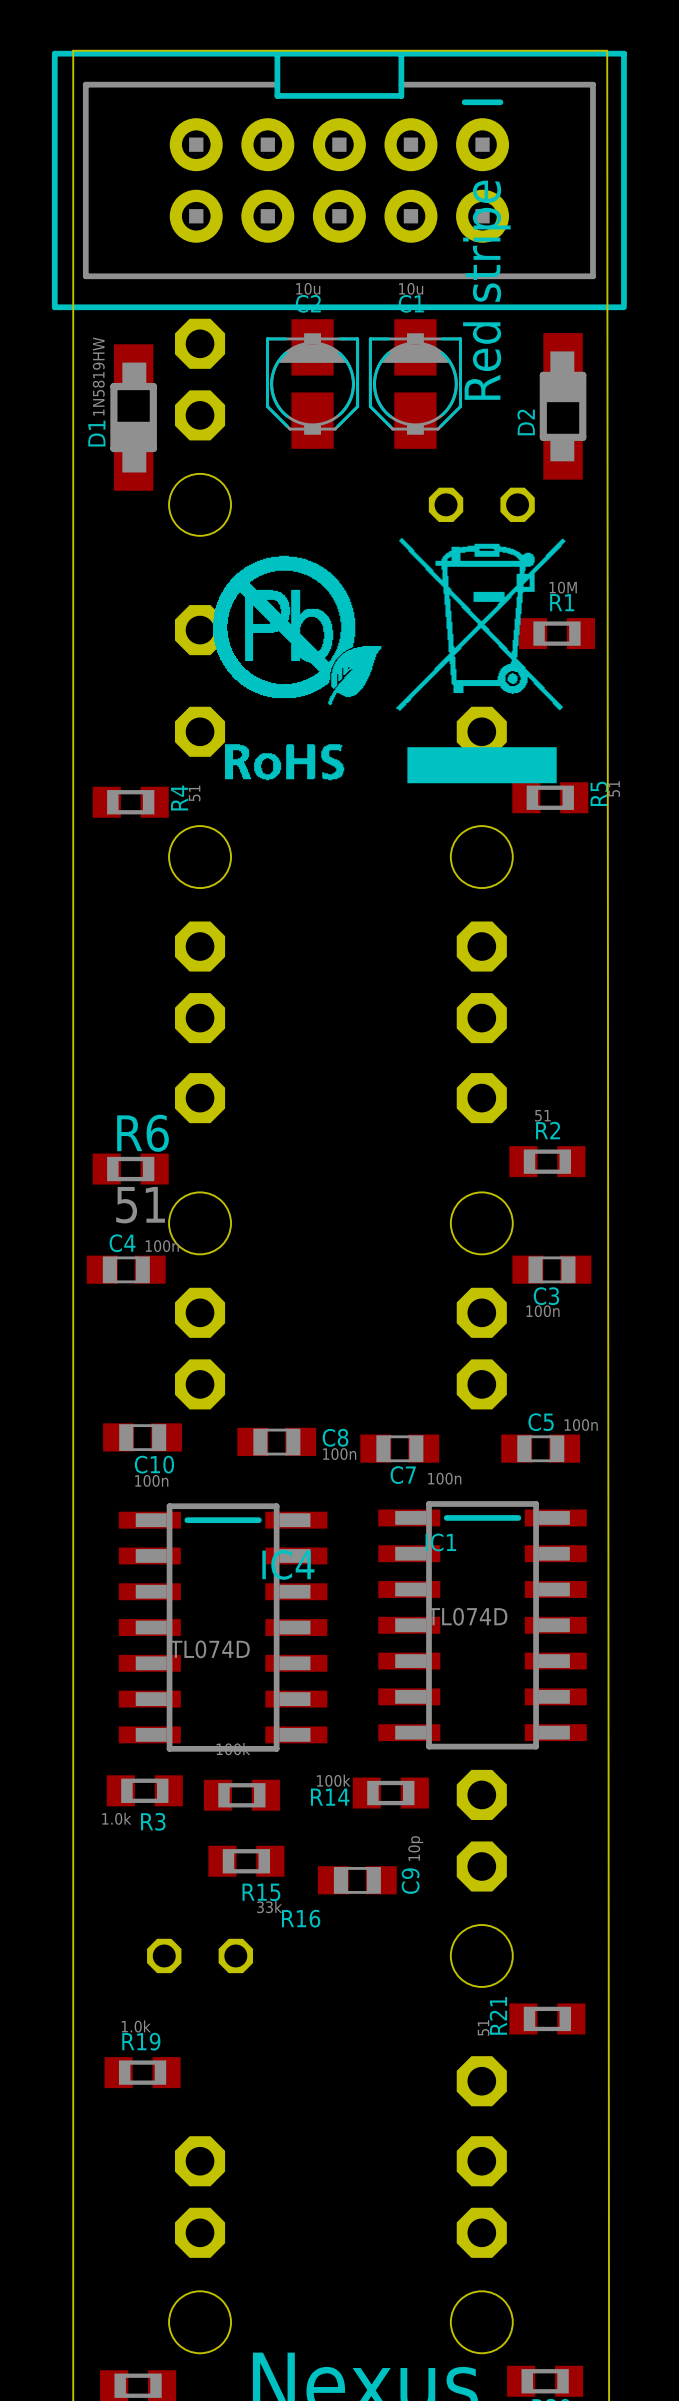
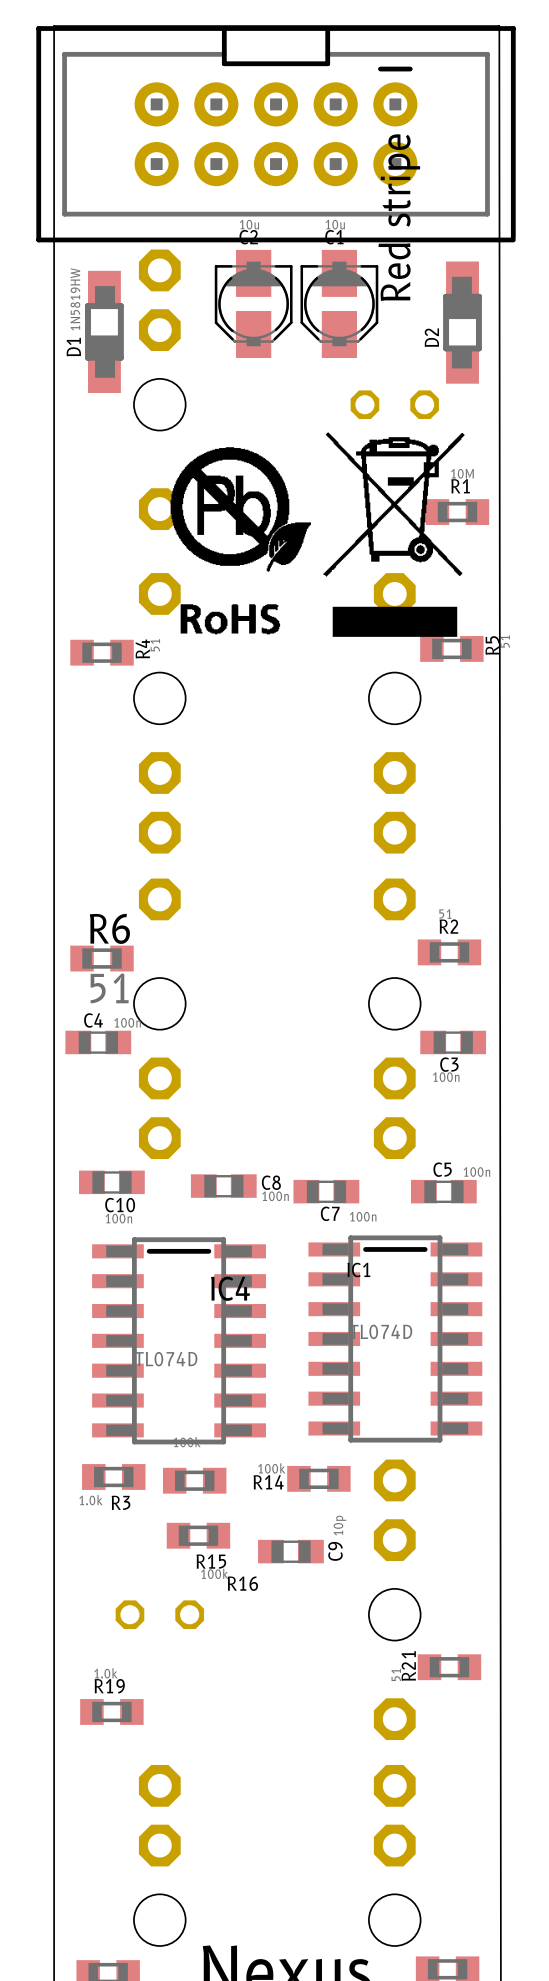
R15 value: 33k (269, 1907) -> 100k (214, 1573)

